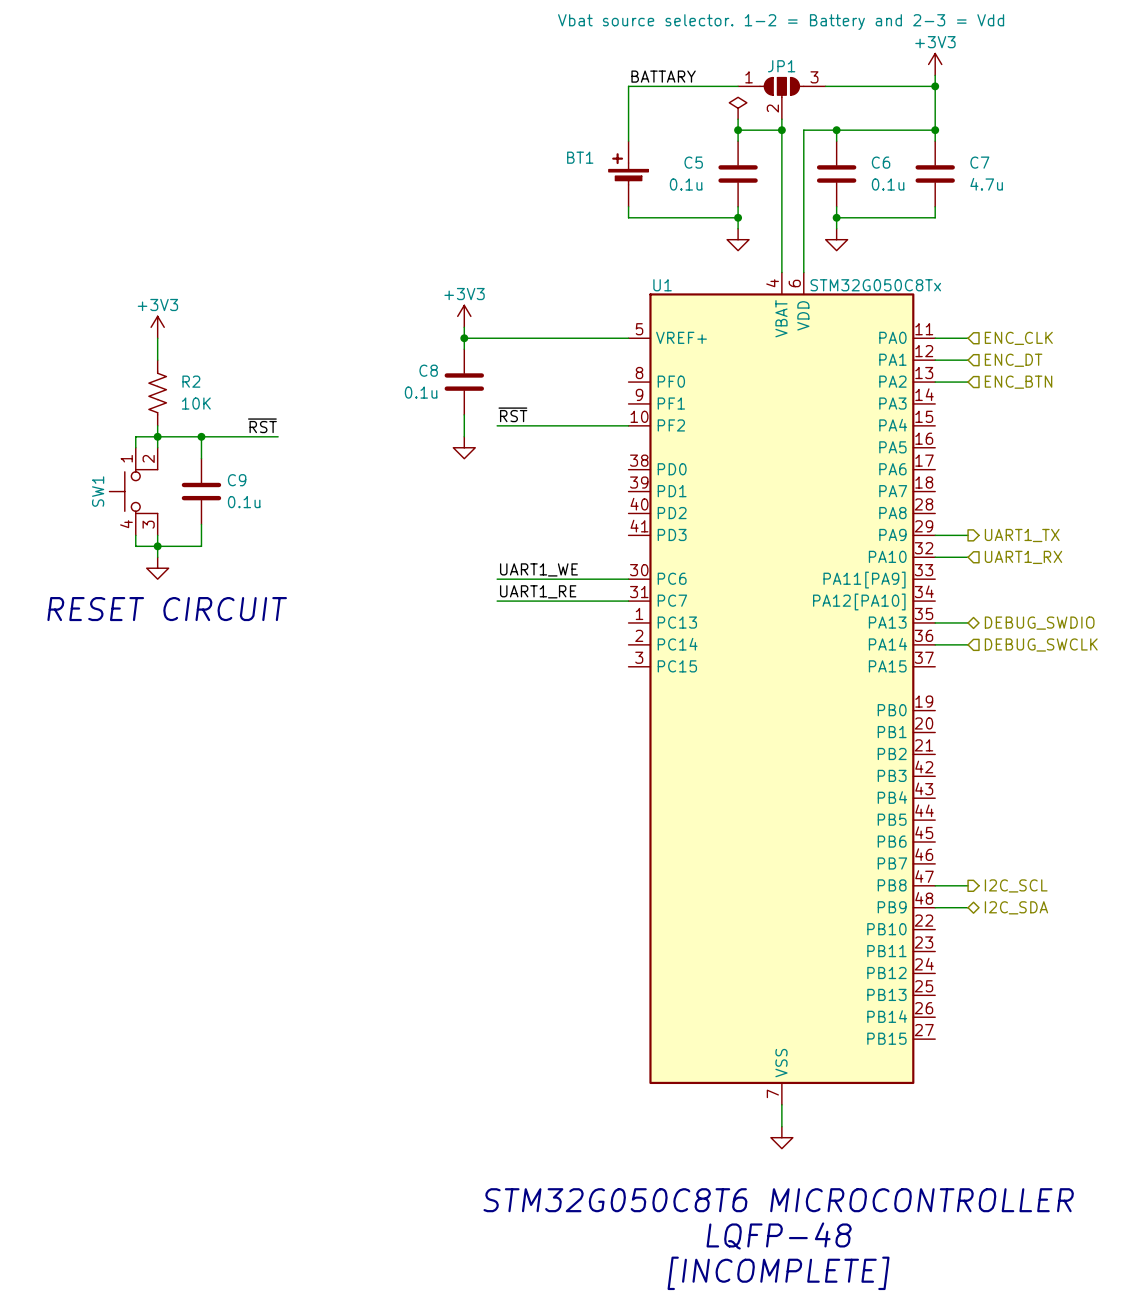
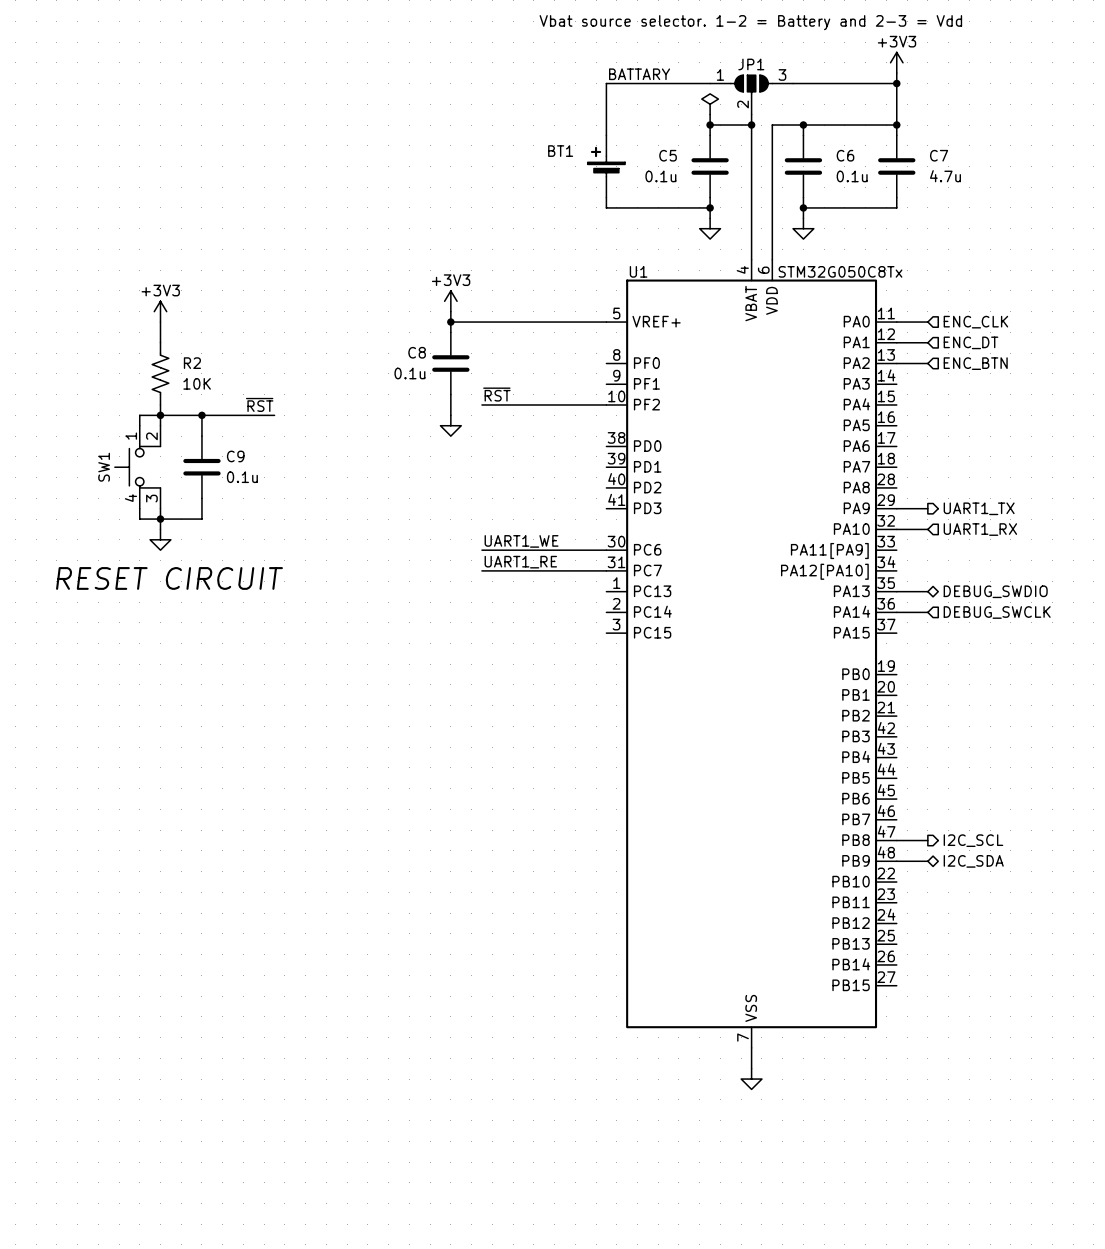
text: STM32G050C8T6 MICROCONTROLLER (778, 1200) -> none
text: LQFP-48 (779, 1235) -> none
text: [INCOMPLETE] (778, 1273) -> none

